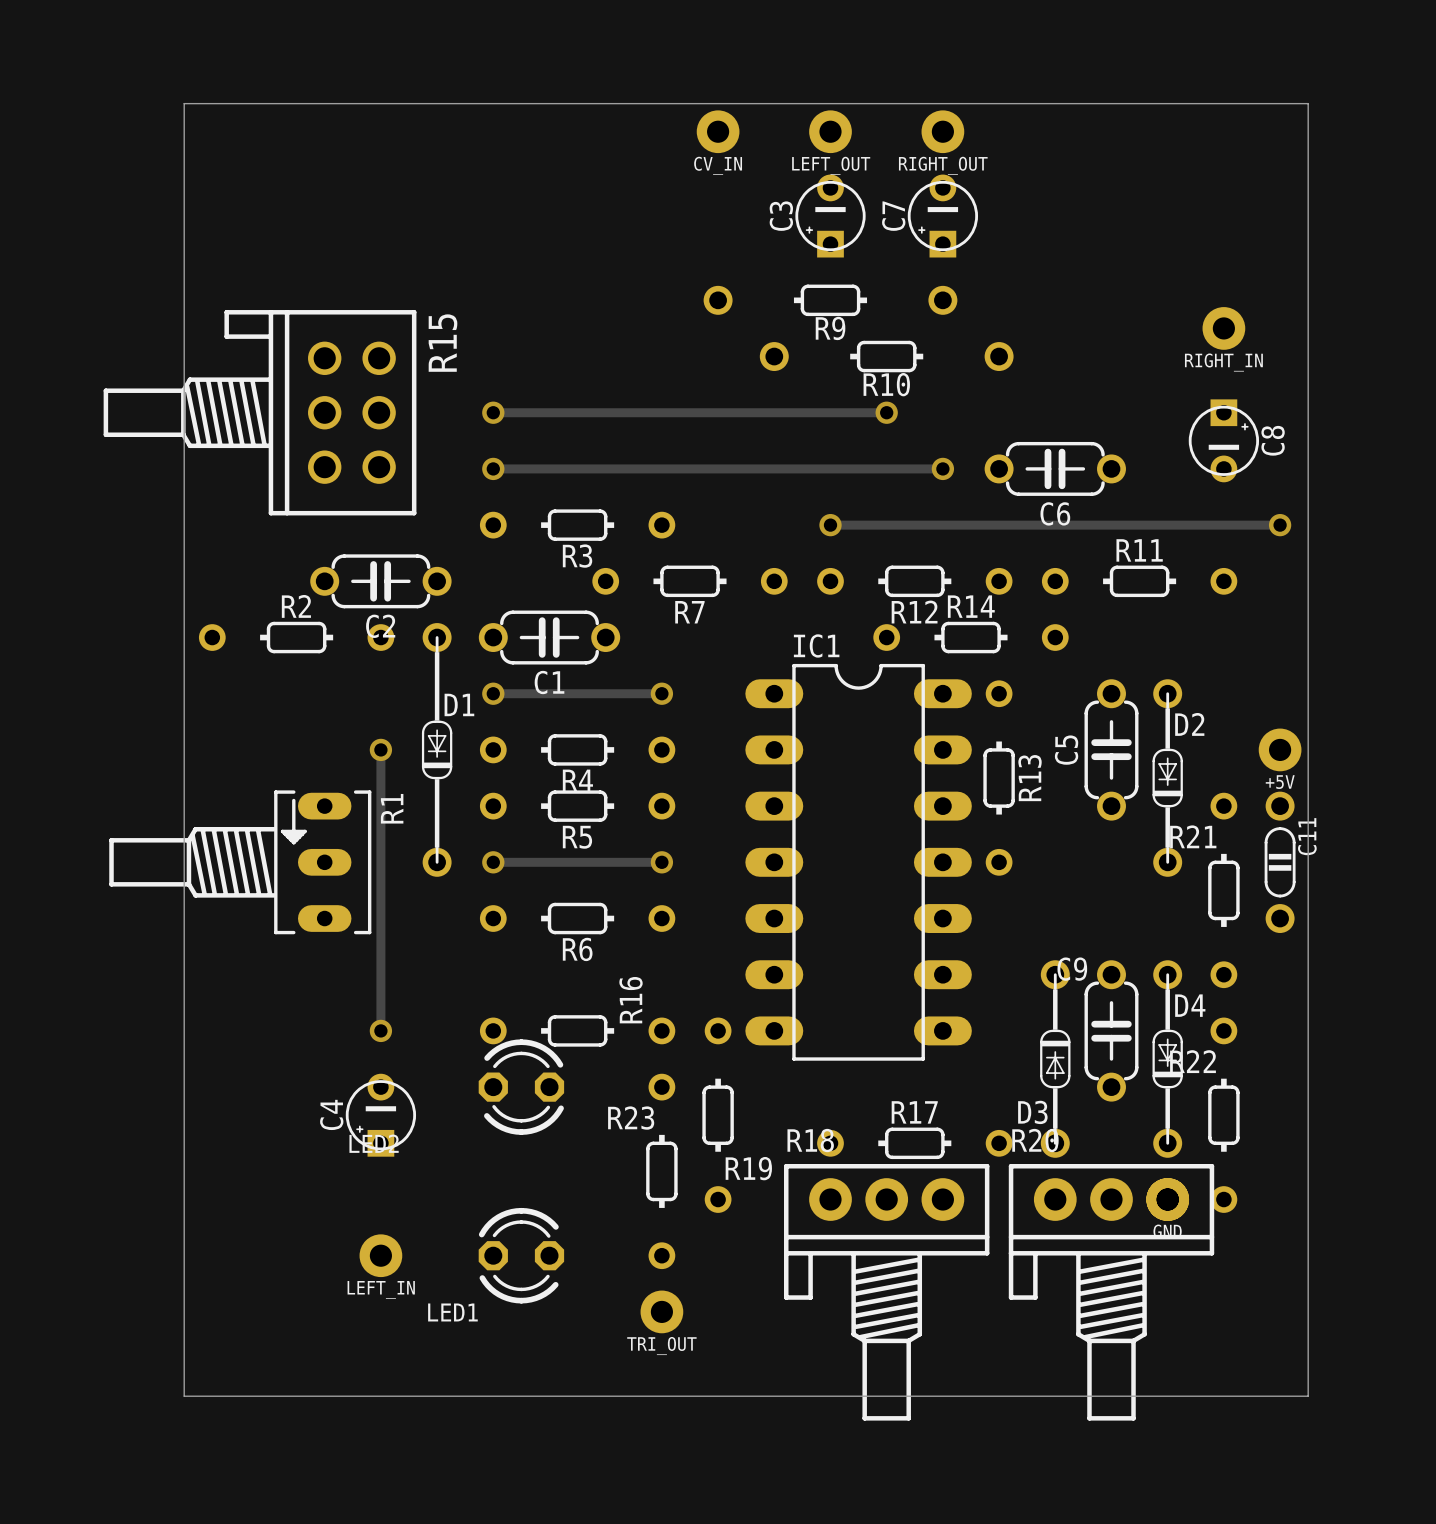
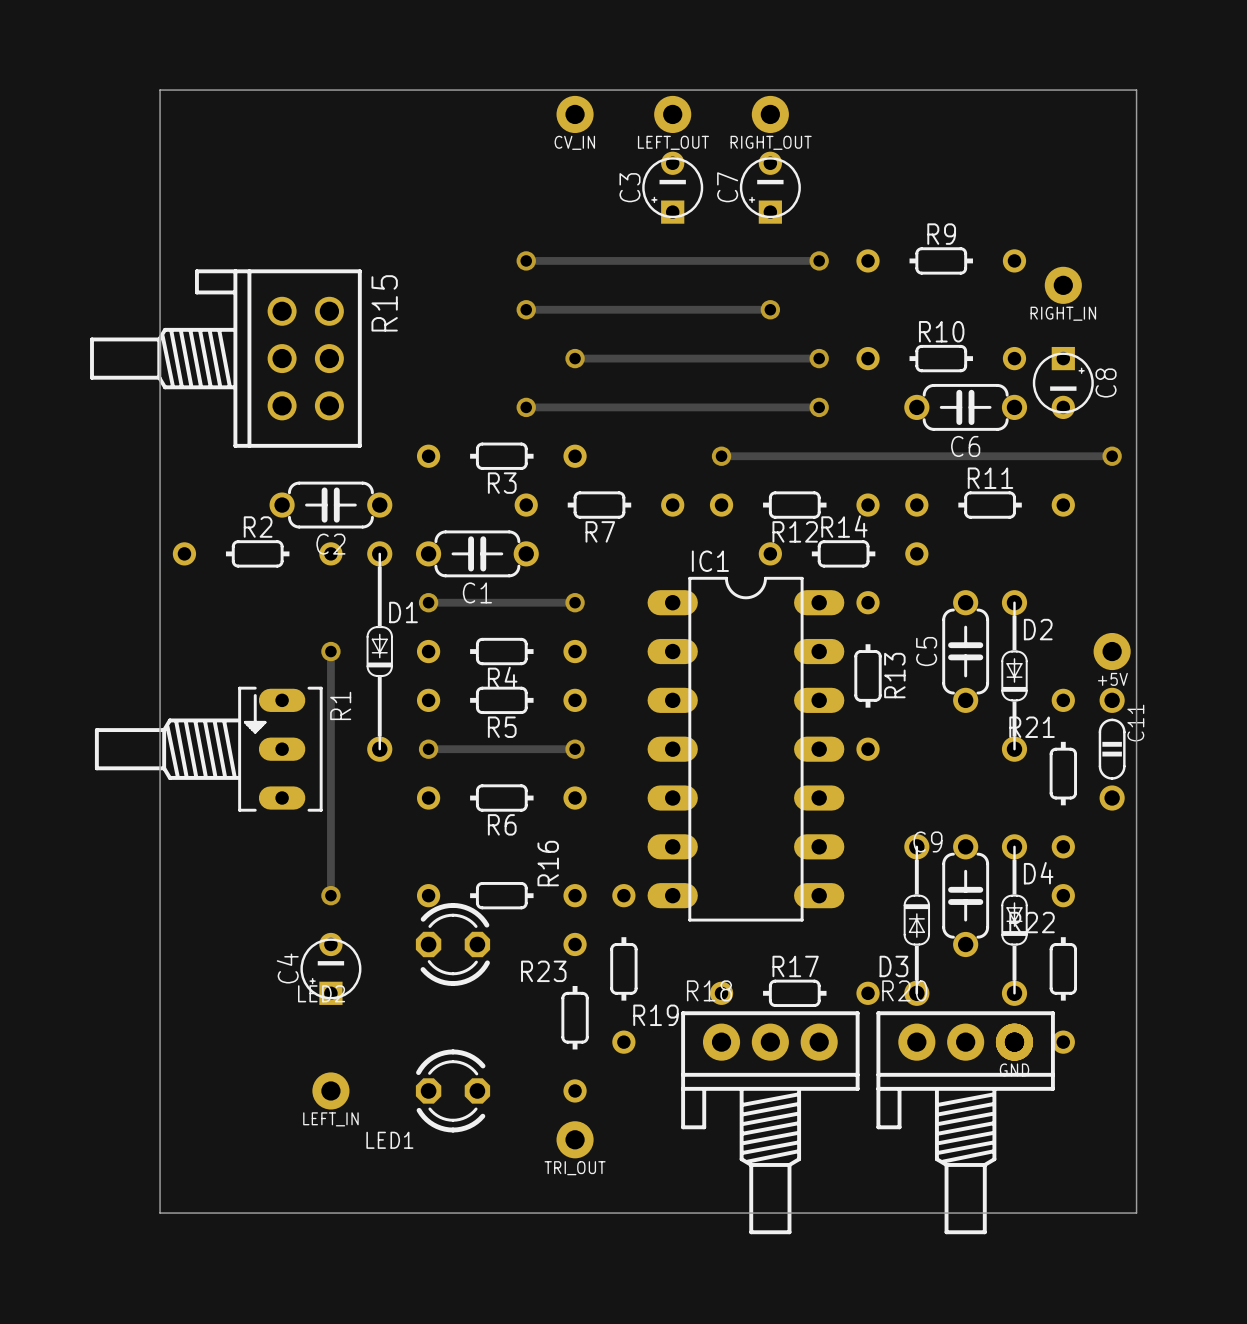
CV_IN position: (718, 131) -> (575, 114)
LEFT_OUT position: (830, 131) -> (672, 114)
RIGHT_OUT position: (942, 131) -> (770, 114)
C3 position: (830, 216) -> (672, 187)
C7 position: (942, 216) -> (770, 187)
R9 footprint: [703, 284, 958, 317] -> [856, 247, 1027, 275]
track: none -> (526, 260) (819, 260)
via: none -> (526, 260)
via: none -> (819, 260)
R9 name position: R9 (830, 328) -> R9 (941, 234)
R10 footprint: [759, 340, 1014, 373] -> [856, 344, 1027, 373]
track: none -> (526, 309) (770, 309)
via: none -> (526, 309)
via: none -> (770, 309)
R10 name position: R10 (886, 384) -> R10 (941, 331)
track: (493, 412) (661, 412) -> none
via: (493, 412) -> none
via: none -> (575, 358)
track: none -> (770, 358) (819, 358)
via: (886, 412) -> none
via: none -> (819, 358)
track: (493, 468) (605, 468) -> none
via: (493, 468) -> none
via: none -> (526, 407)
C6 position: (1055, 468) -> (965, 407)

